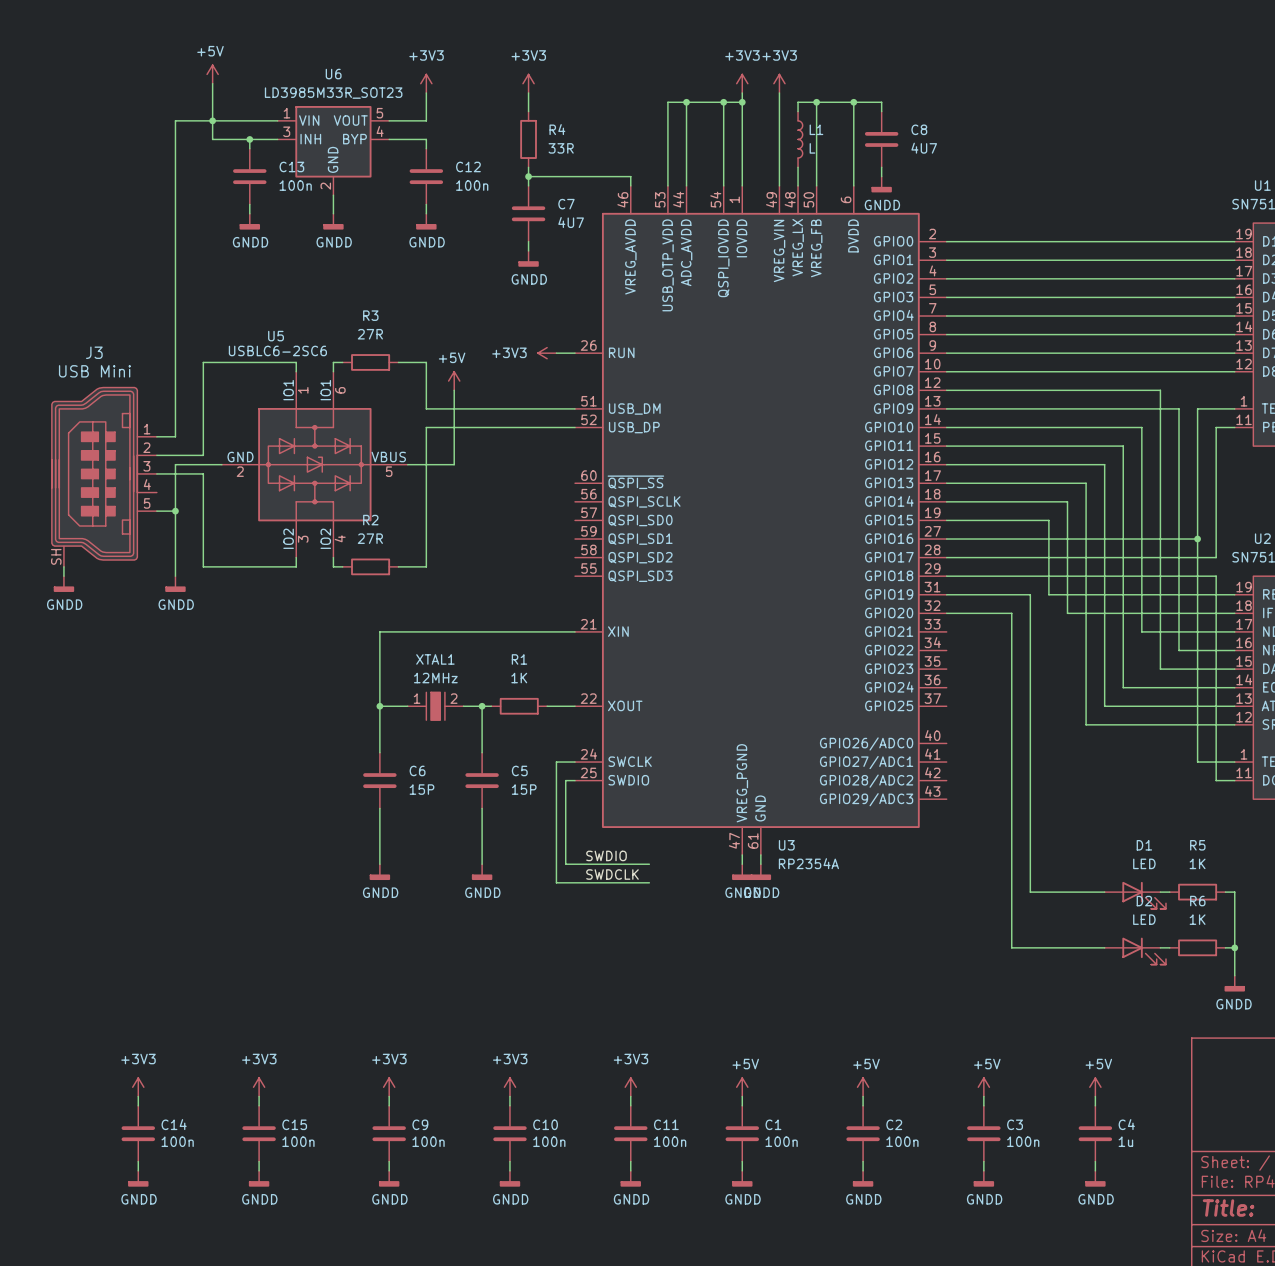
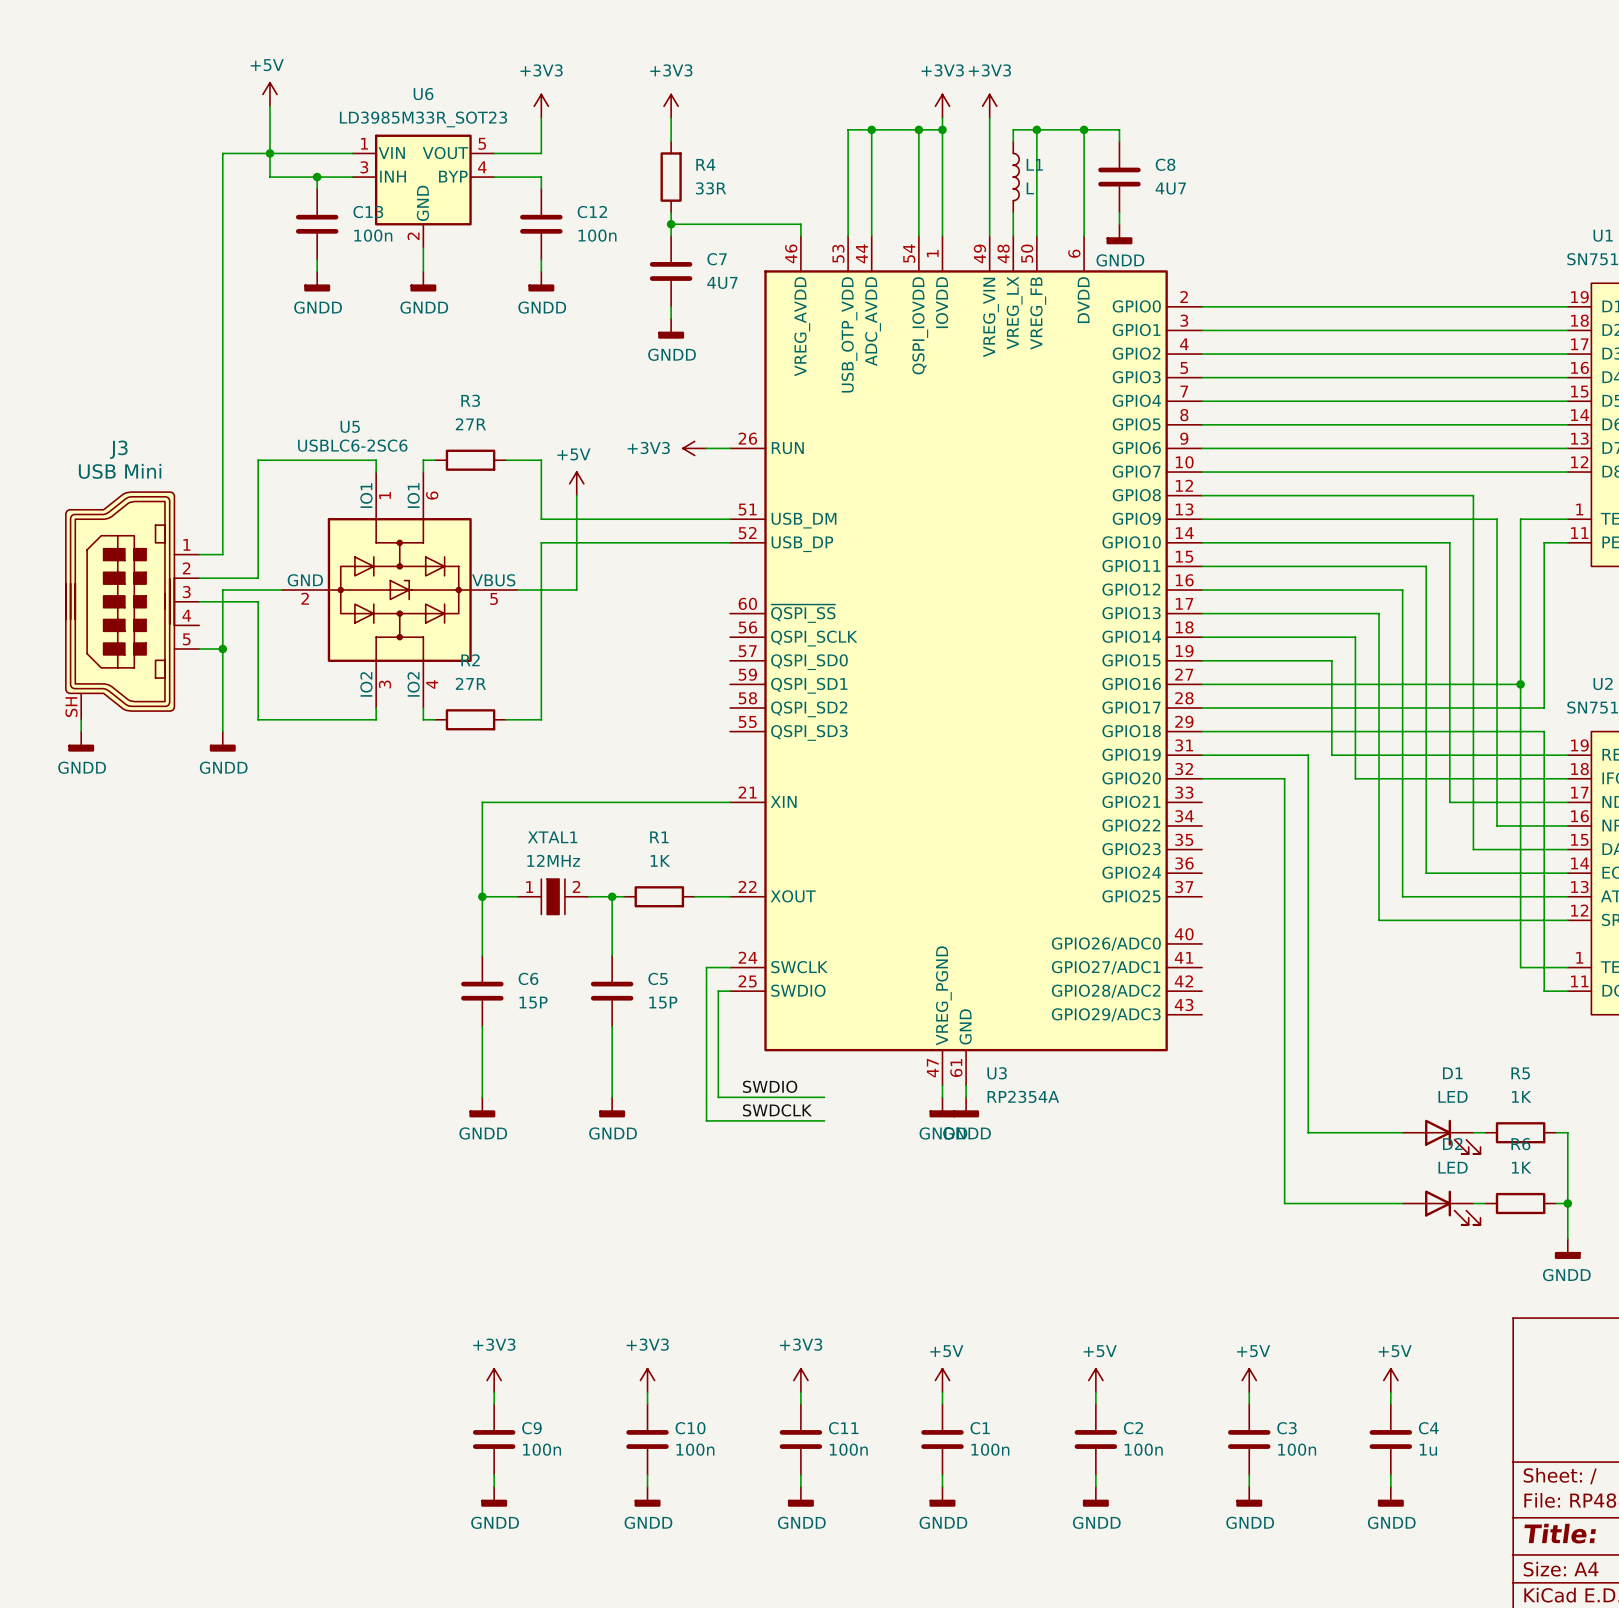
power symbol: +3V3 (138, 1087) -> none
power symbol: +3V3 (259, 1087) -> none
wire: (138, 1096) (138, 1105) -> none
wire: (259, 1096) (259, 1105) -> none
C14: 100n (138, 1133) -> none
C15: 100n (259, 1133) -> none
wire: (138, 1161) (138, 1170) -> none
wire: (259, 1161) (259, 1170) -> none
power symbol: GNDD (138, 1178) -> none
power symbol: GNDD (259, 1178) -> none

